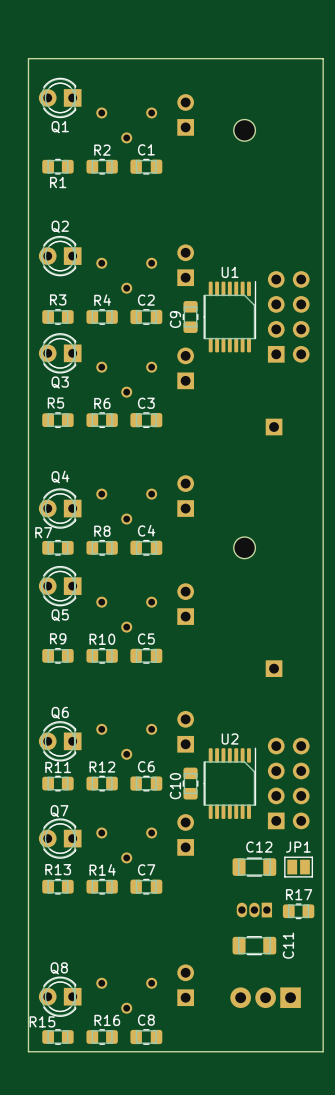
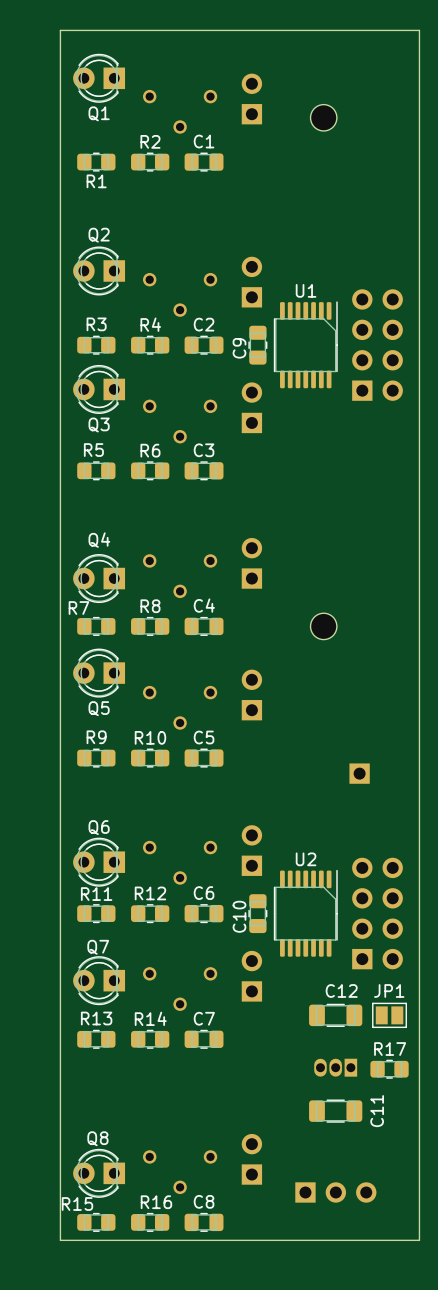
part: (274, 427) -> none
part: (265, 997) -> none
part: none -> (335, 1192)

